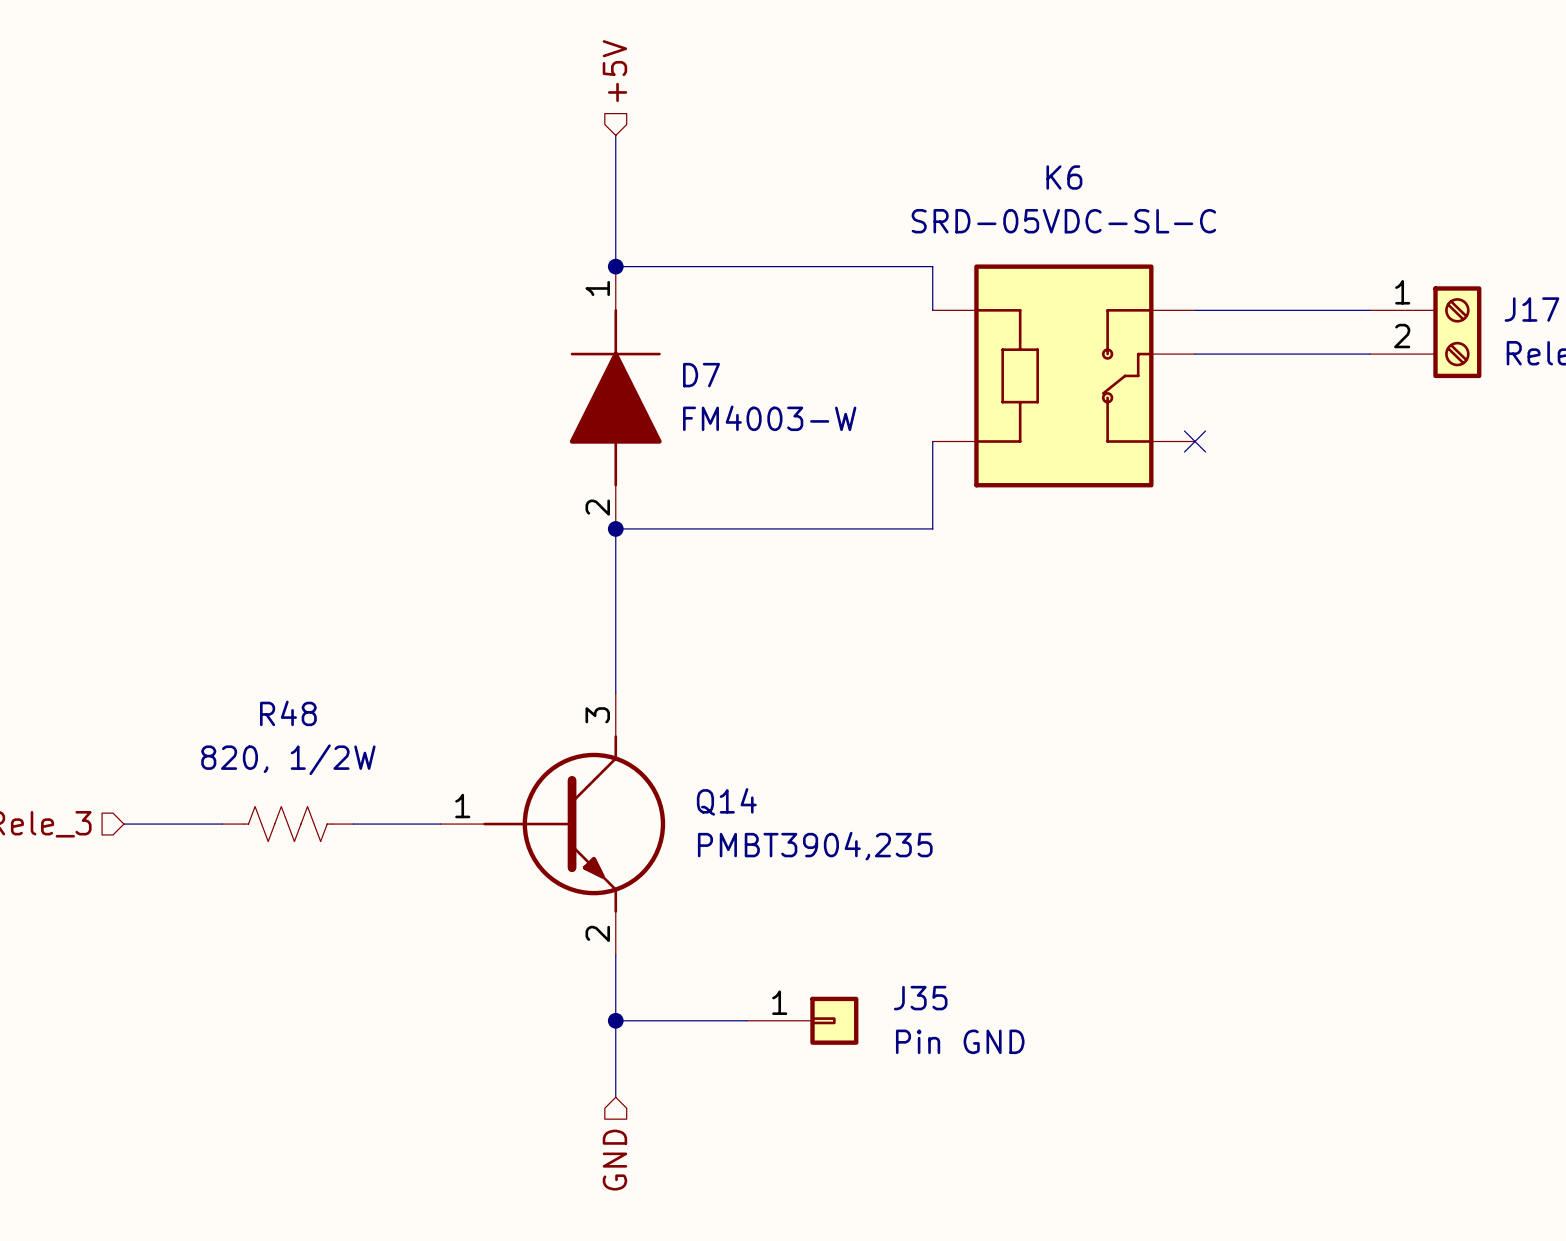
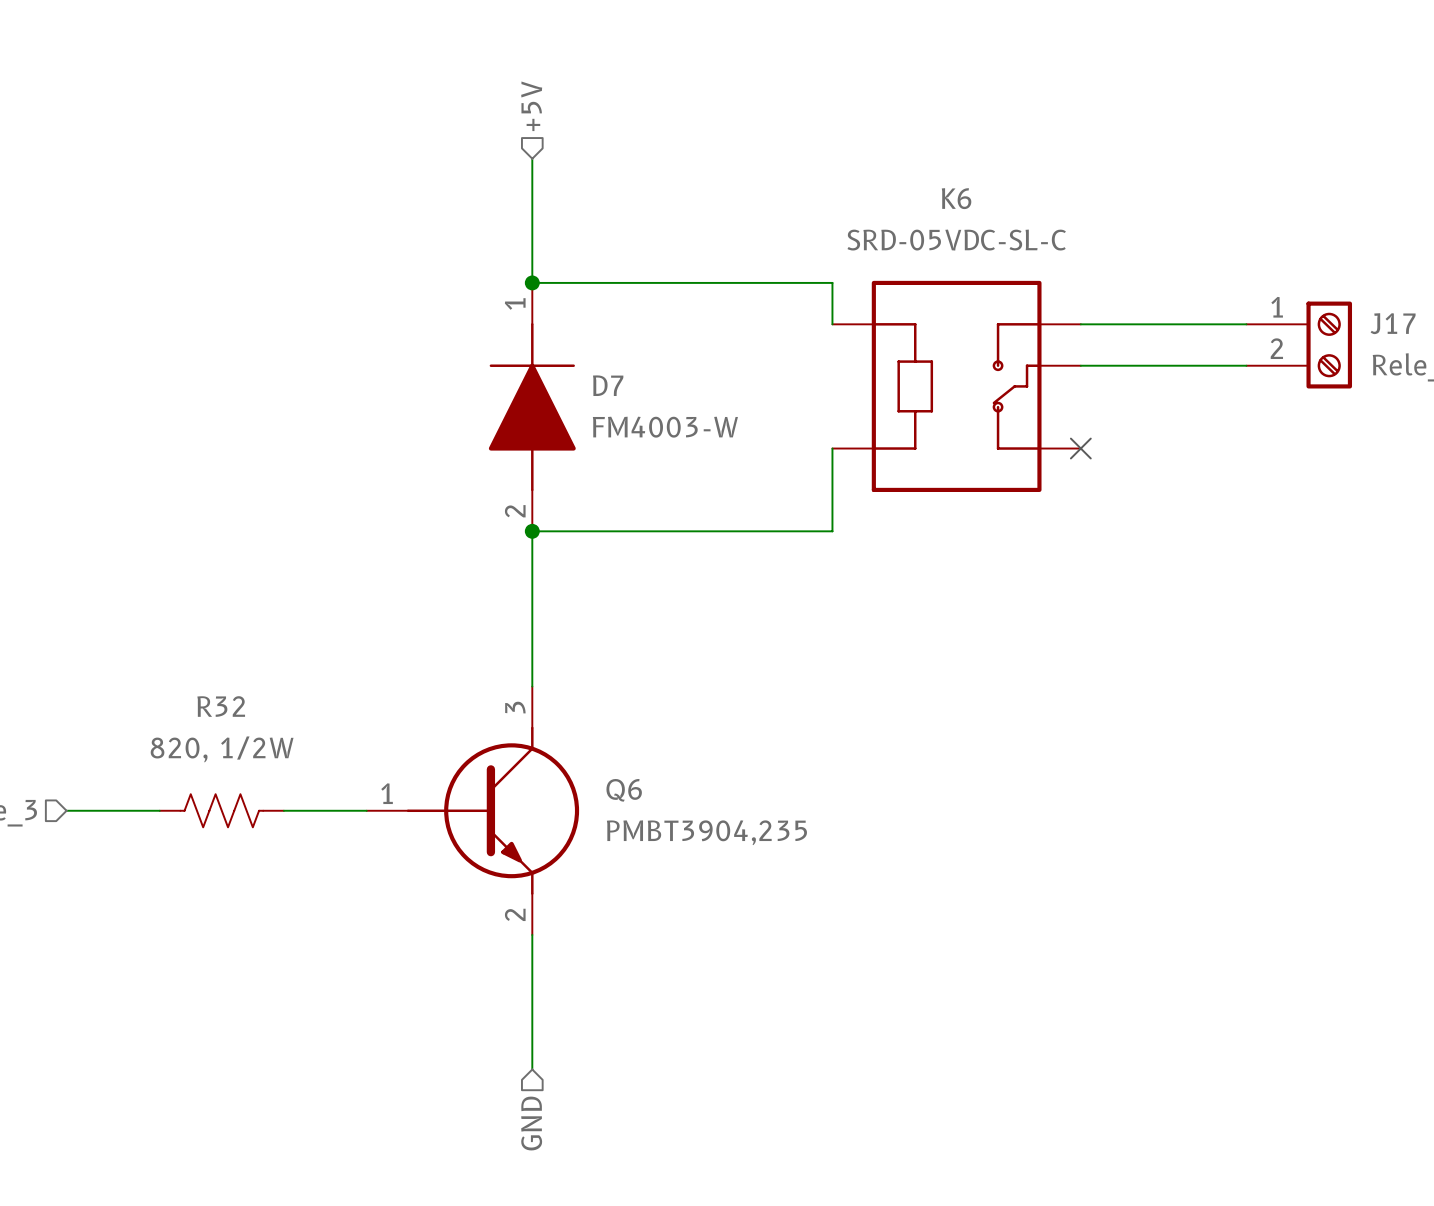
R48 name: R48 (288, 713) -> R32 (221, 706)
Q14 name: Q14 (726, 801) -> Q6 (624, 790)
wire: (615, 1020) (746, 1020) -> none
junction: (615, 1020) -> none
J35: Pin GND (802, 1020) -> none

